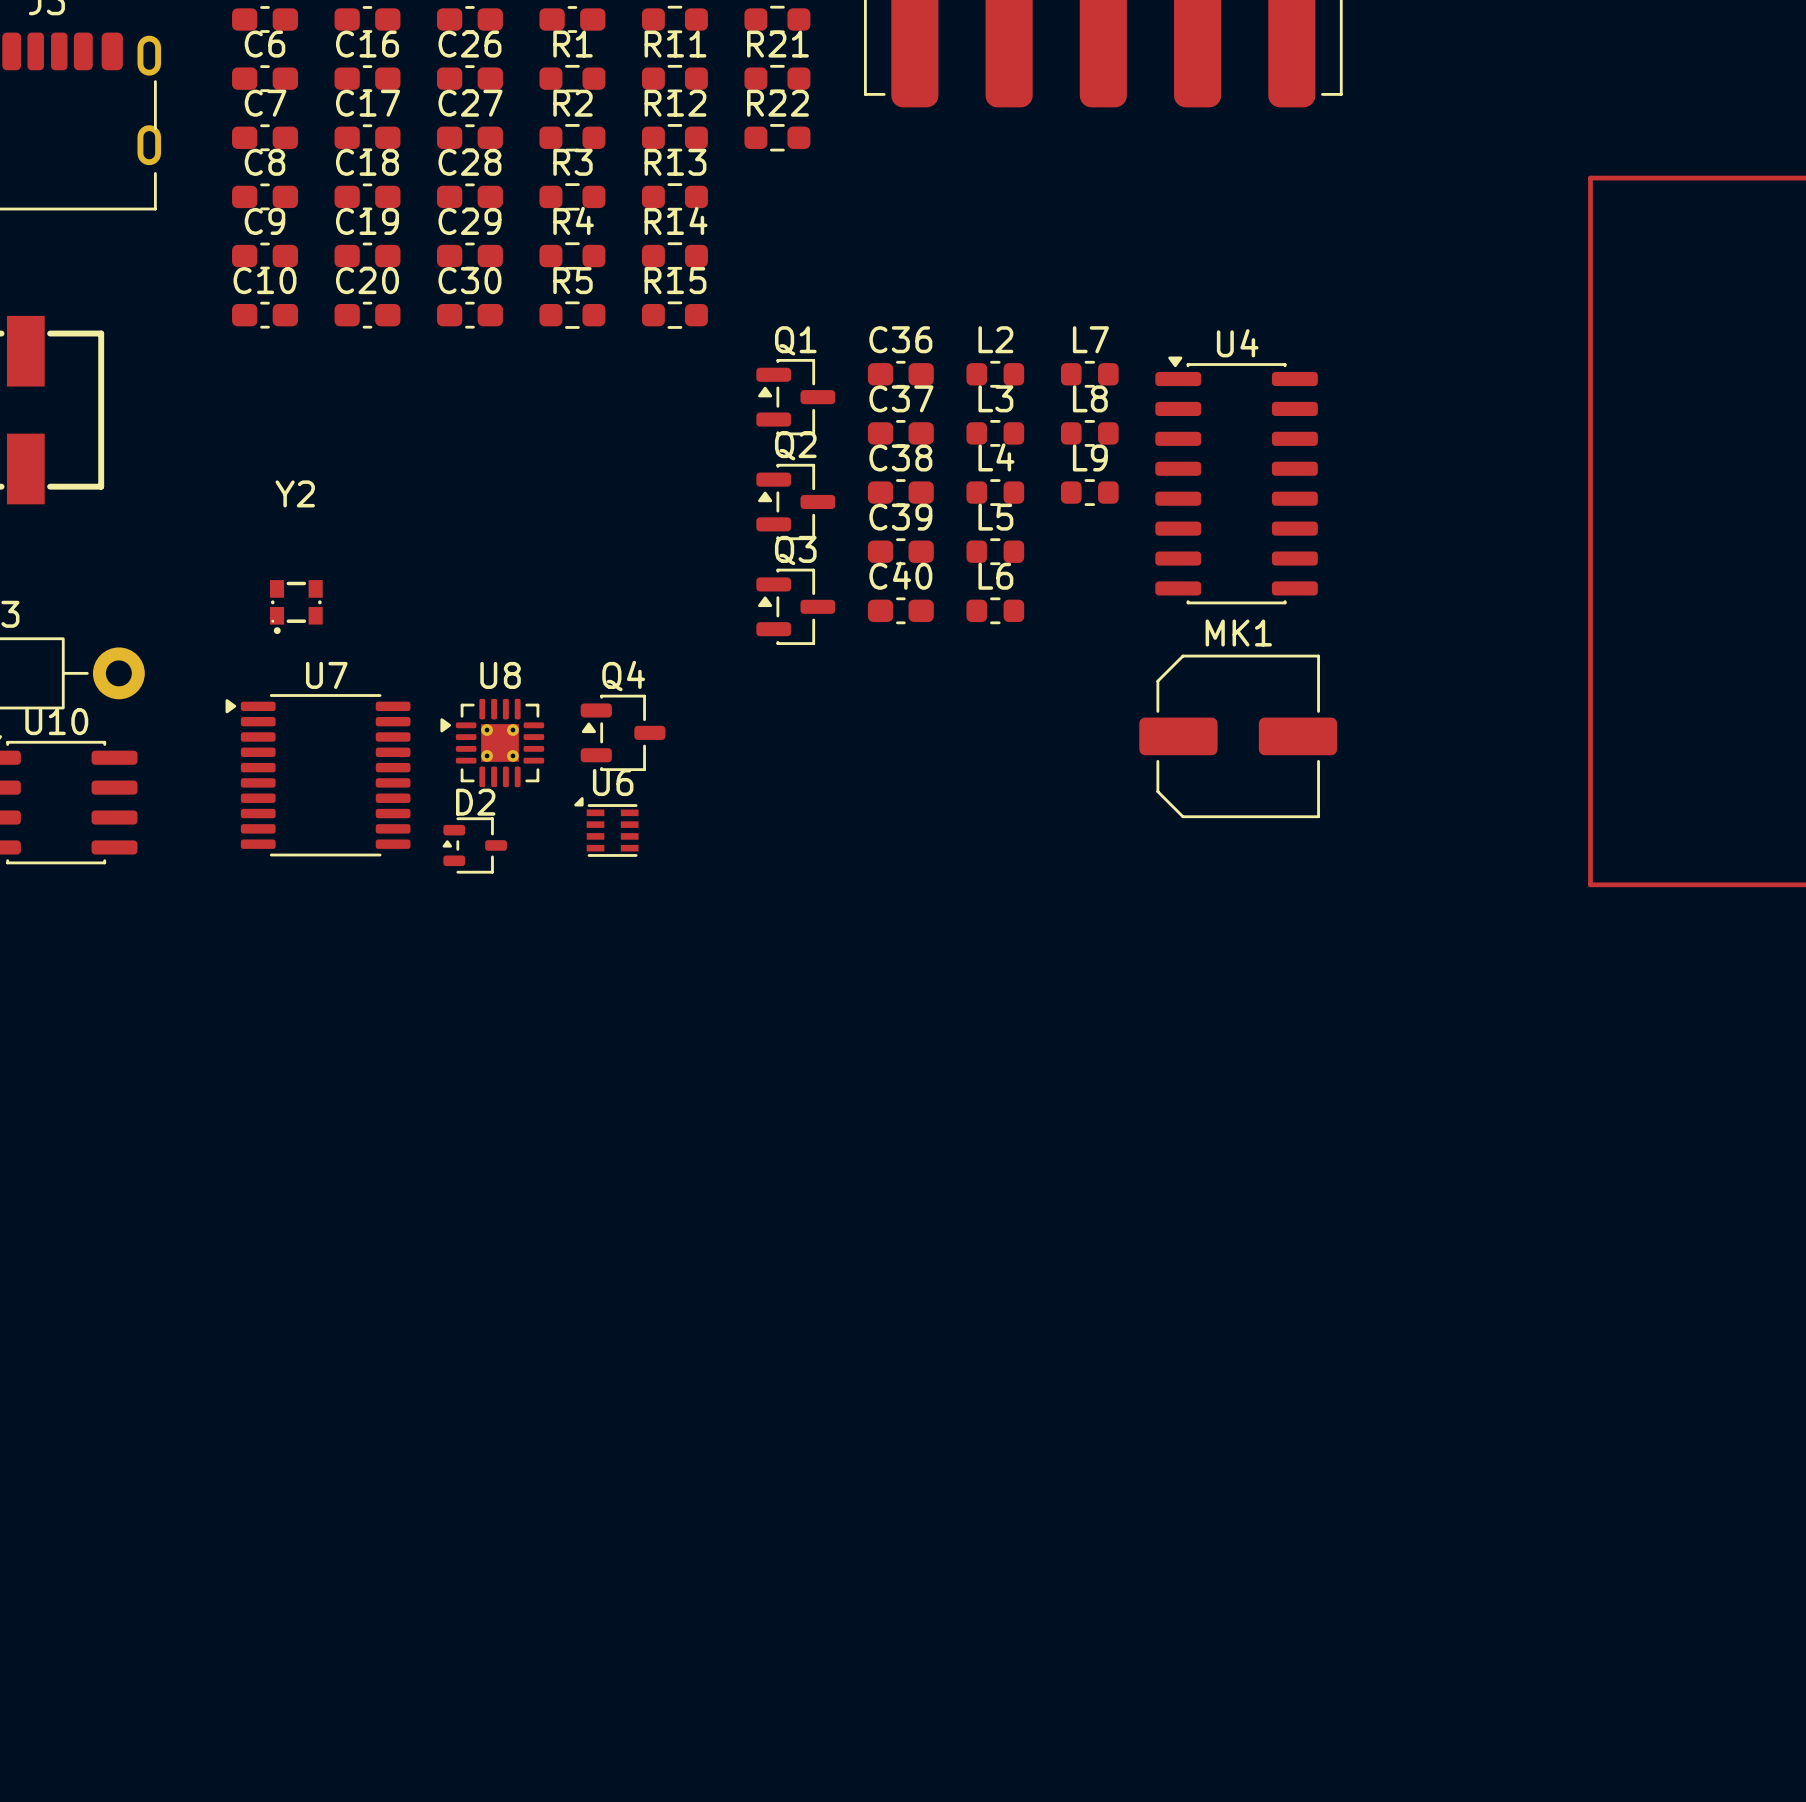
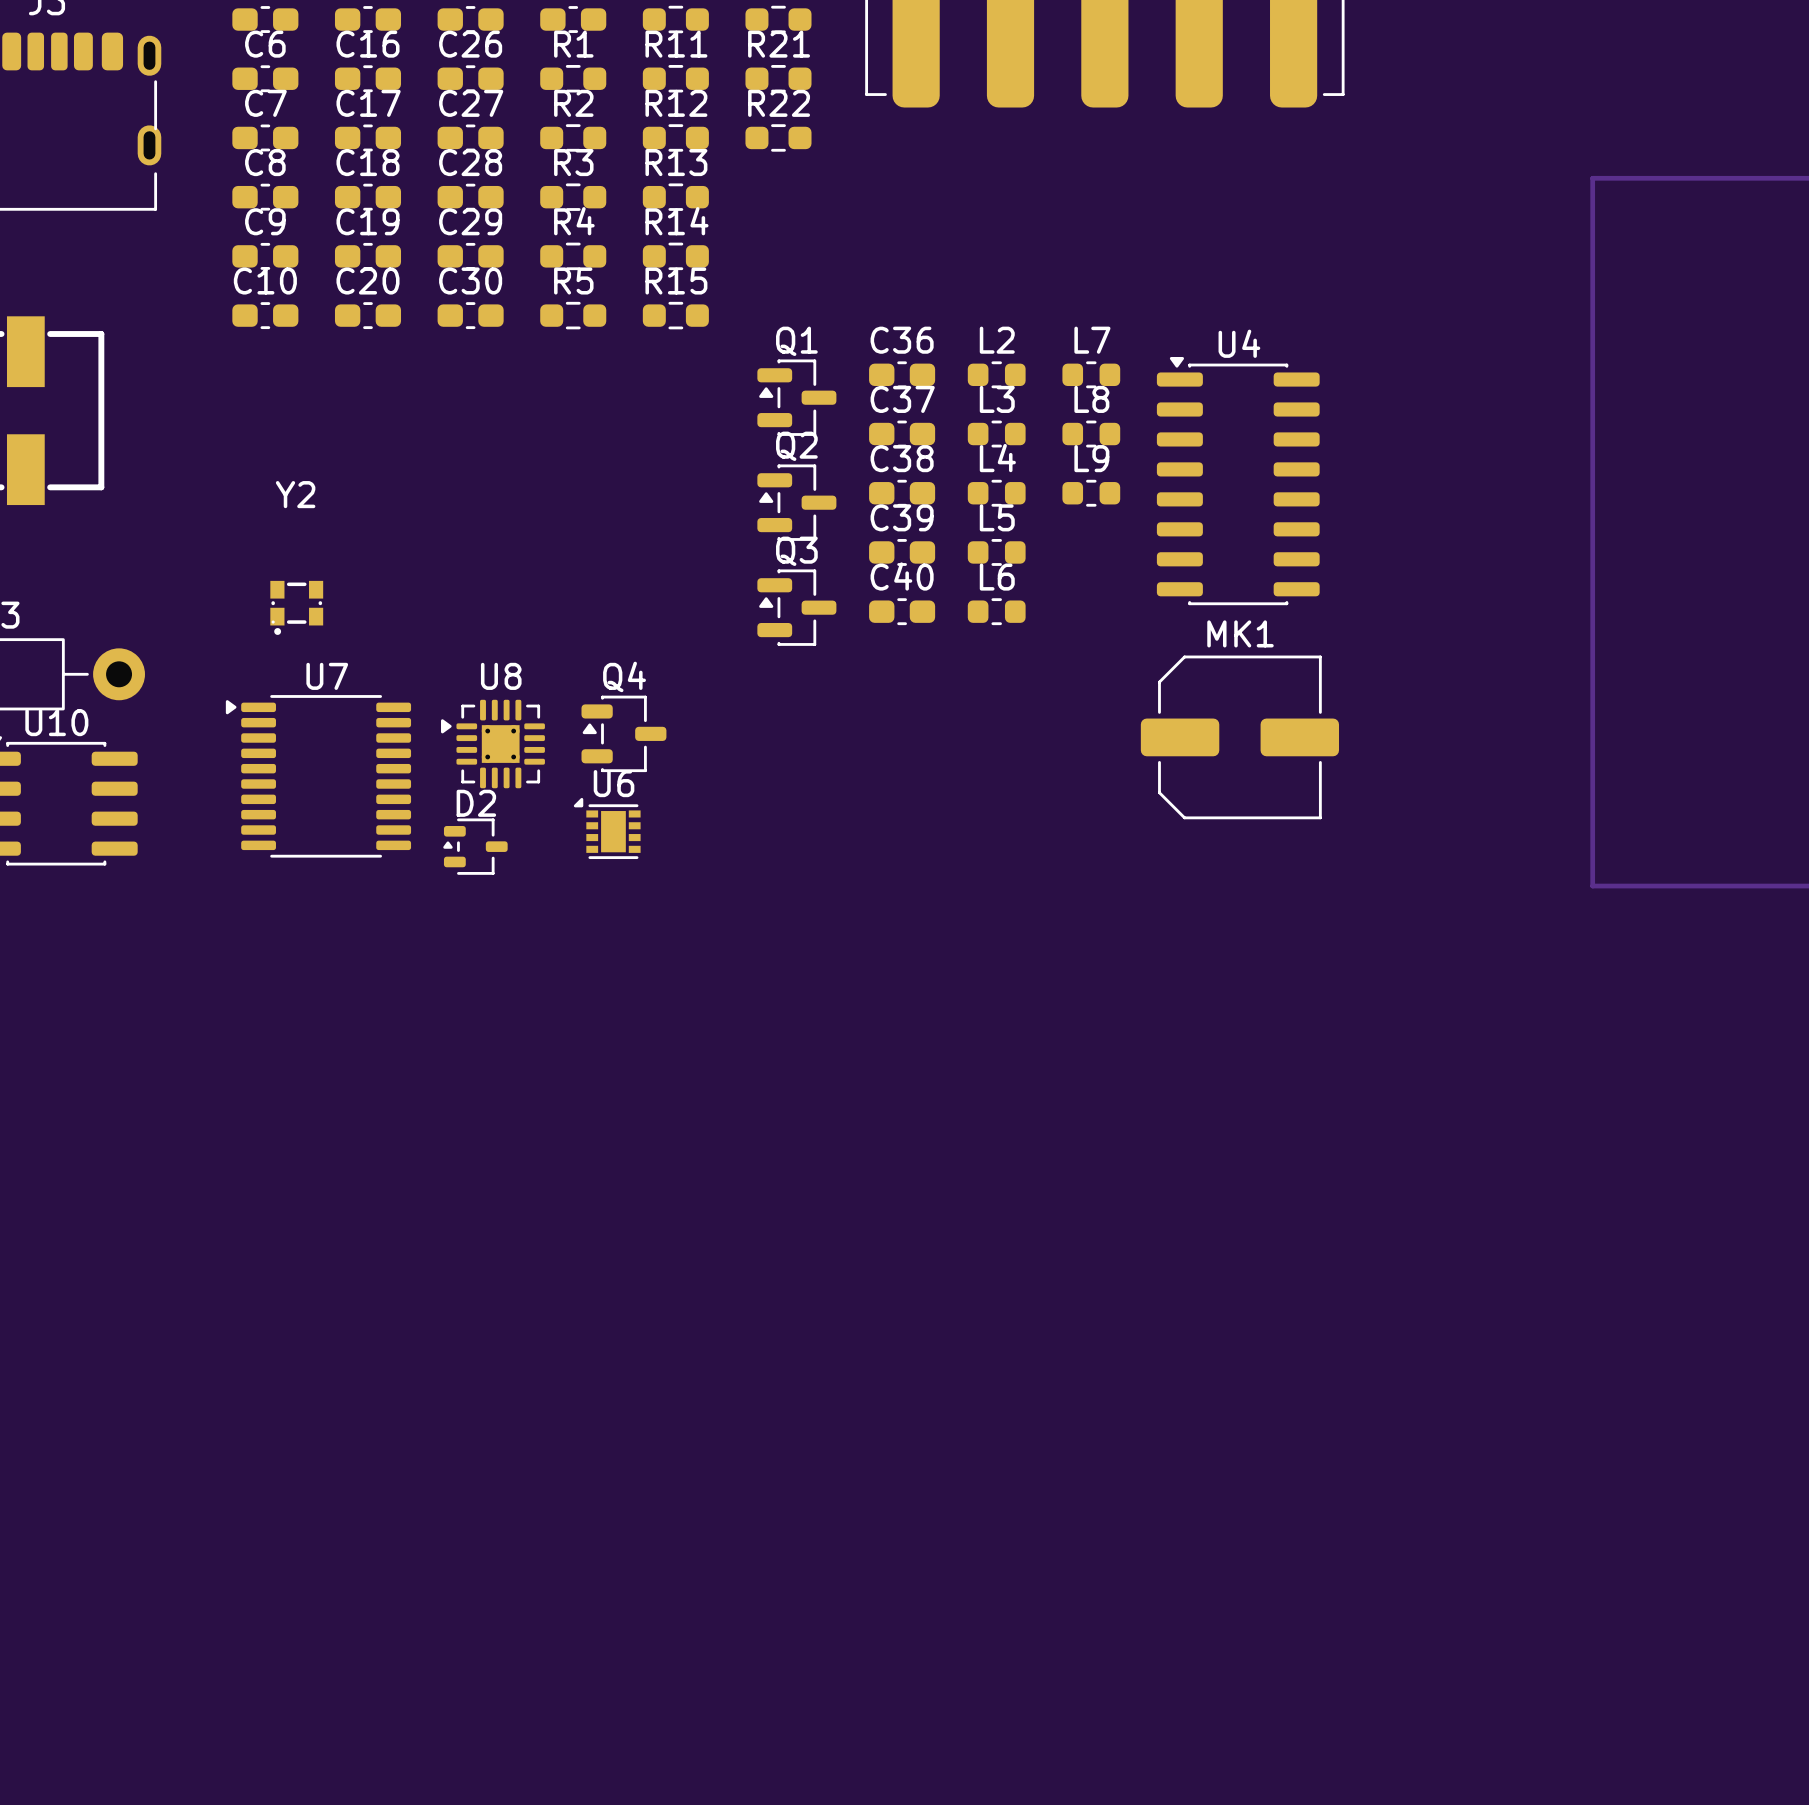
U6 footprint: [574, 797, 639, 857] -> [573, 797, 641, 860]

